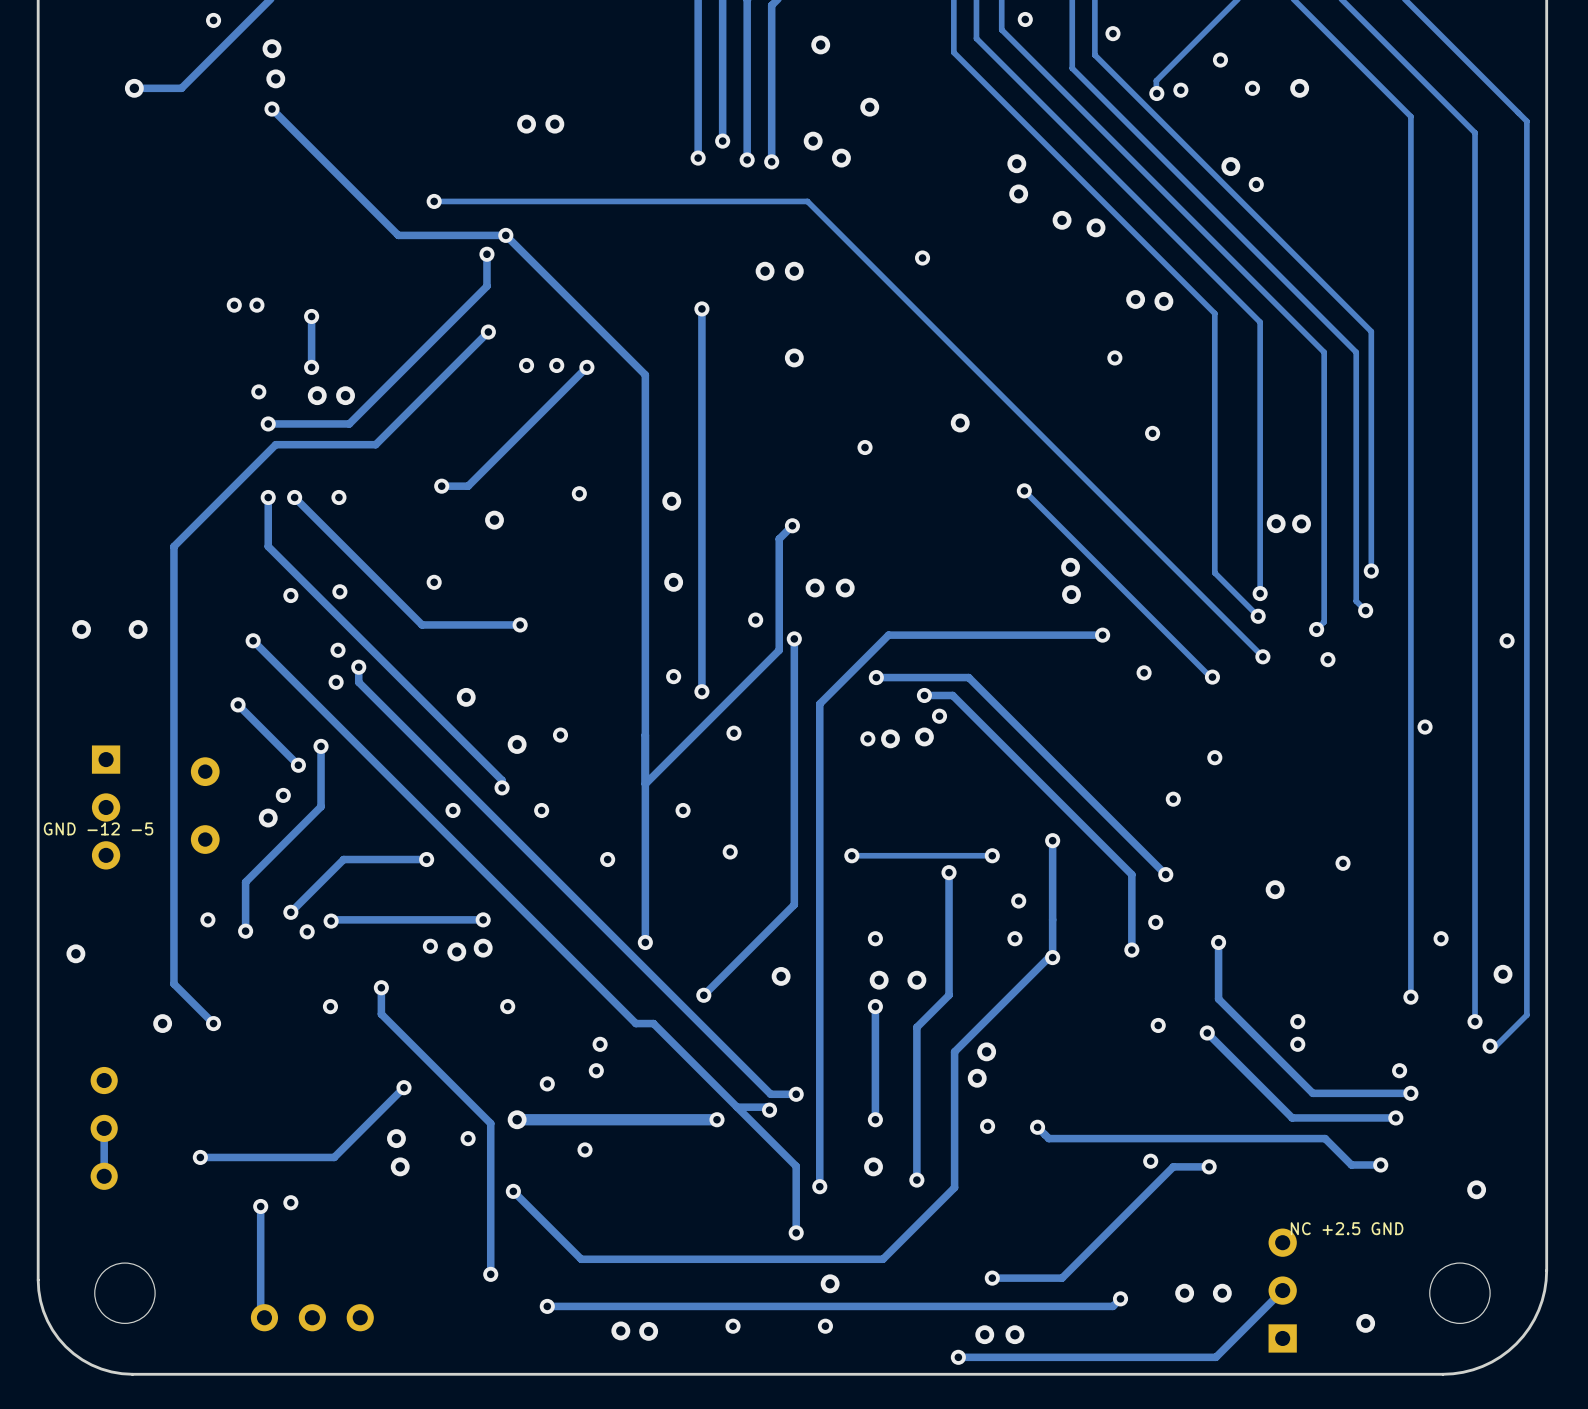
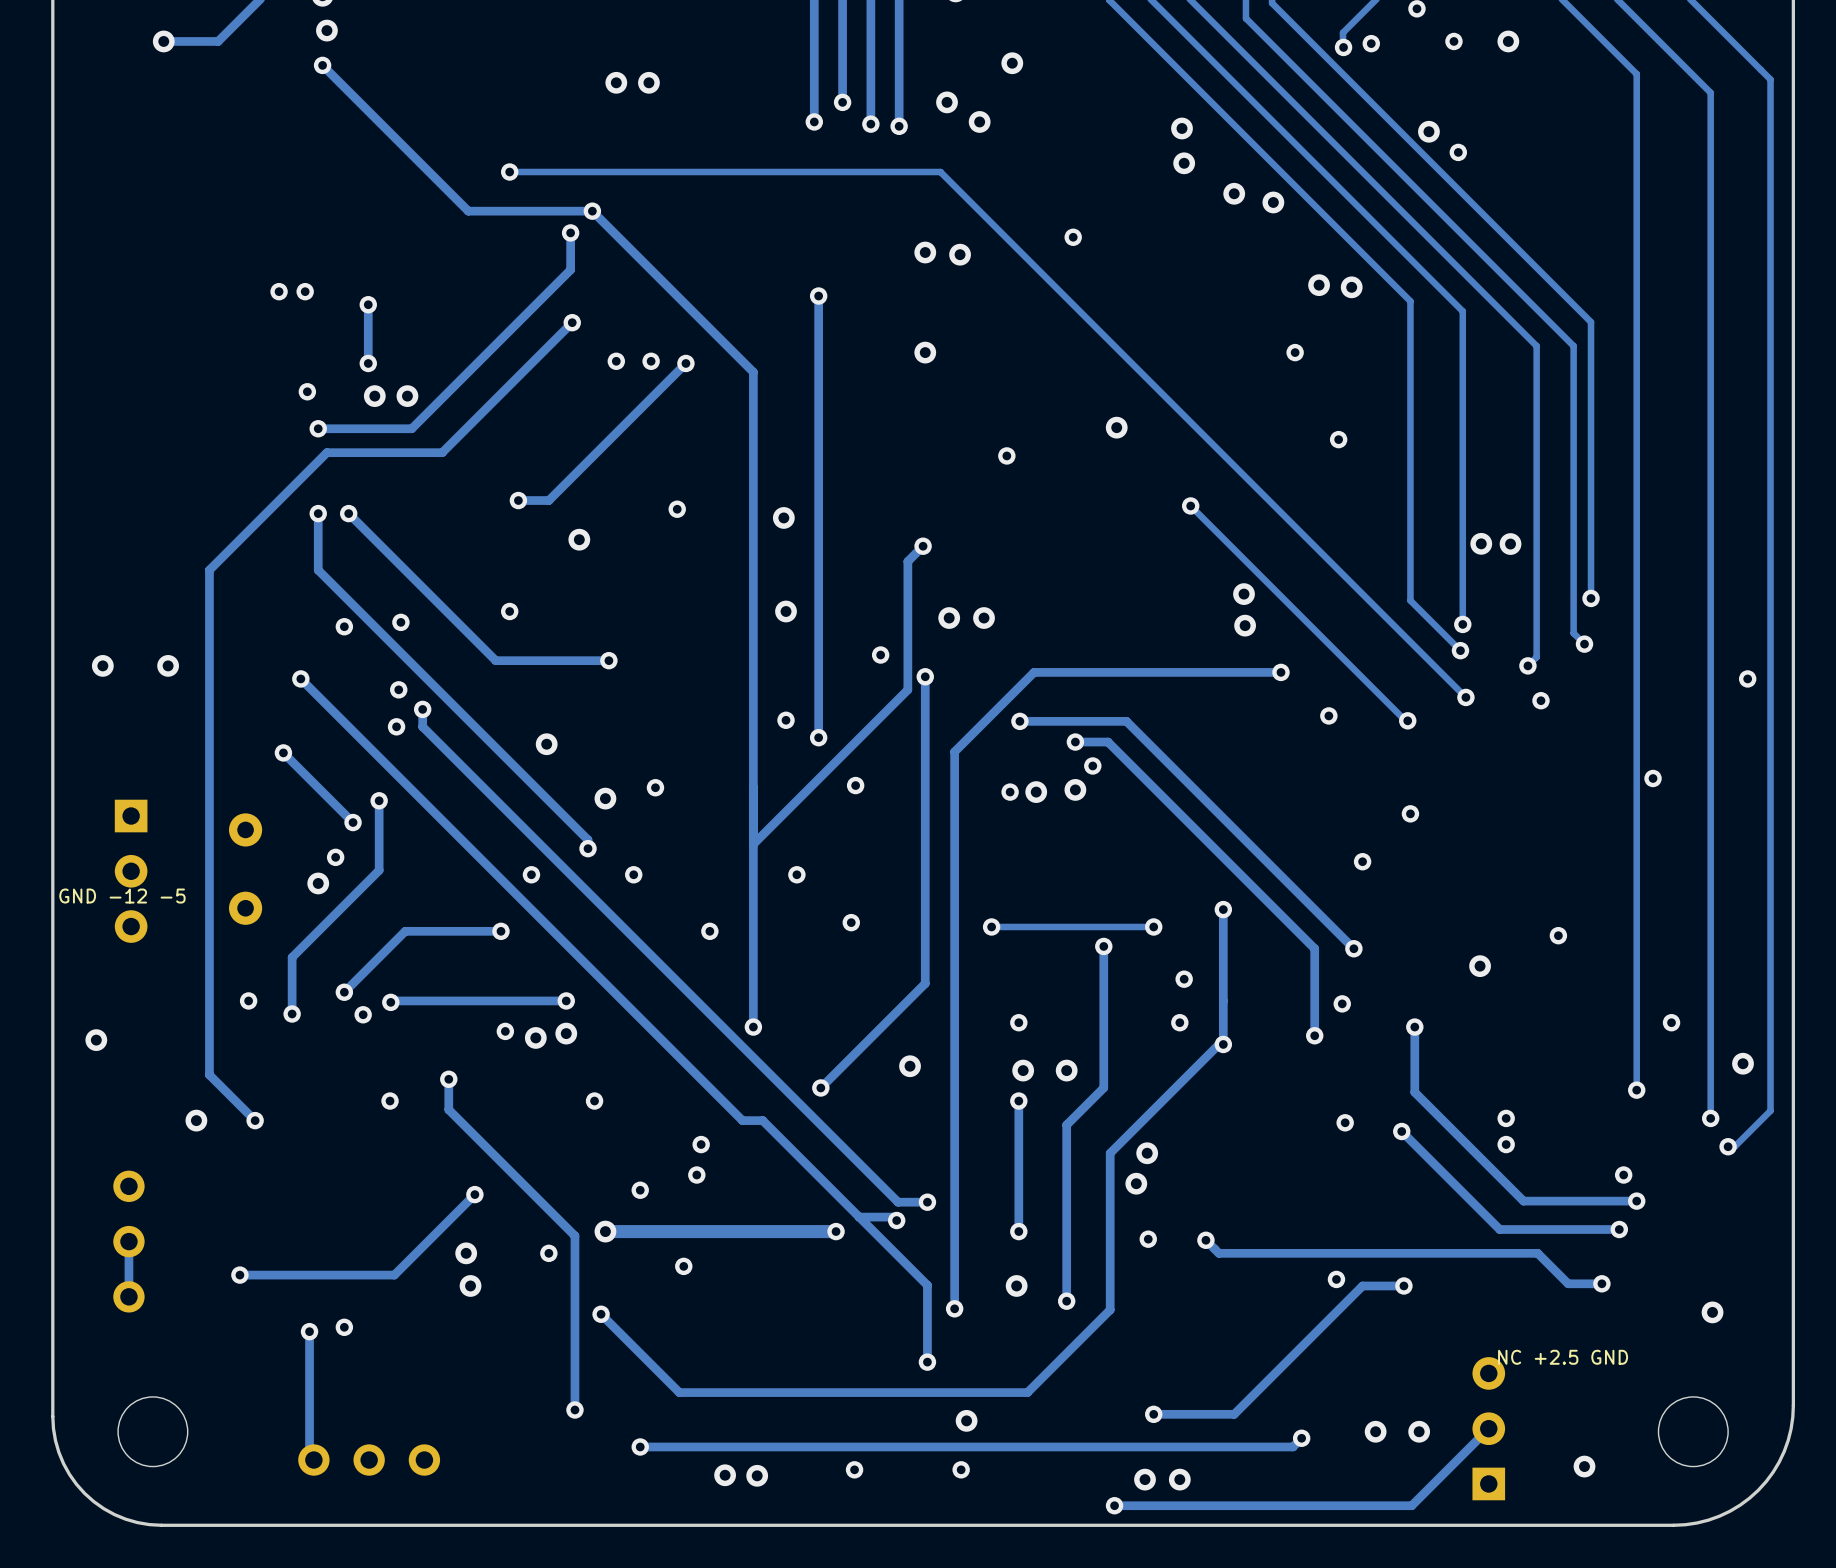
via position: (765, 271) -> (960, 254)
via: (338, 497) -> none

